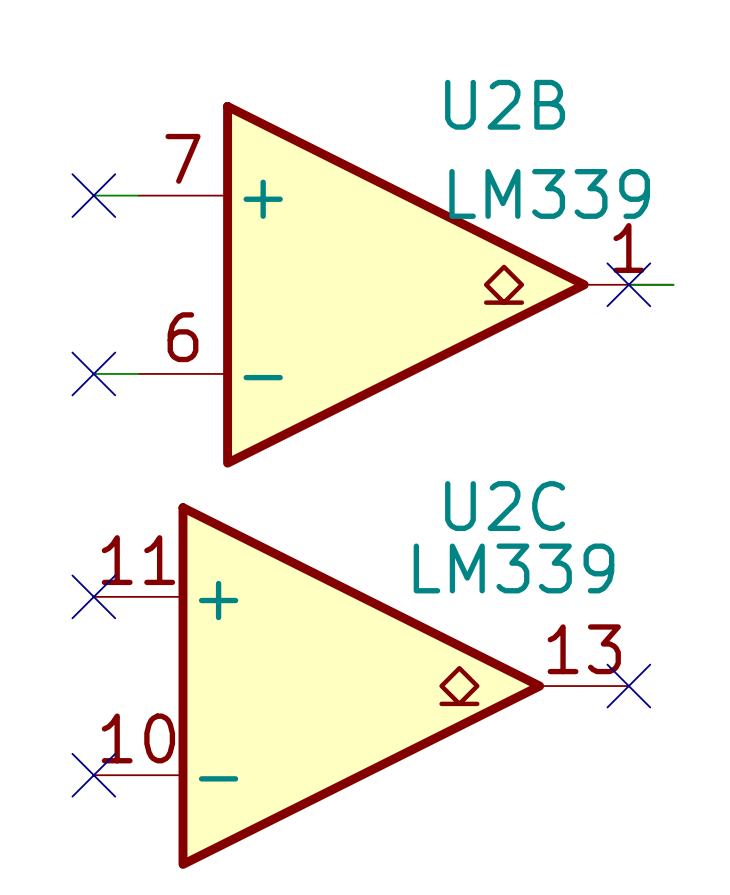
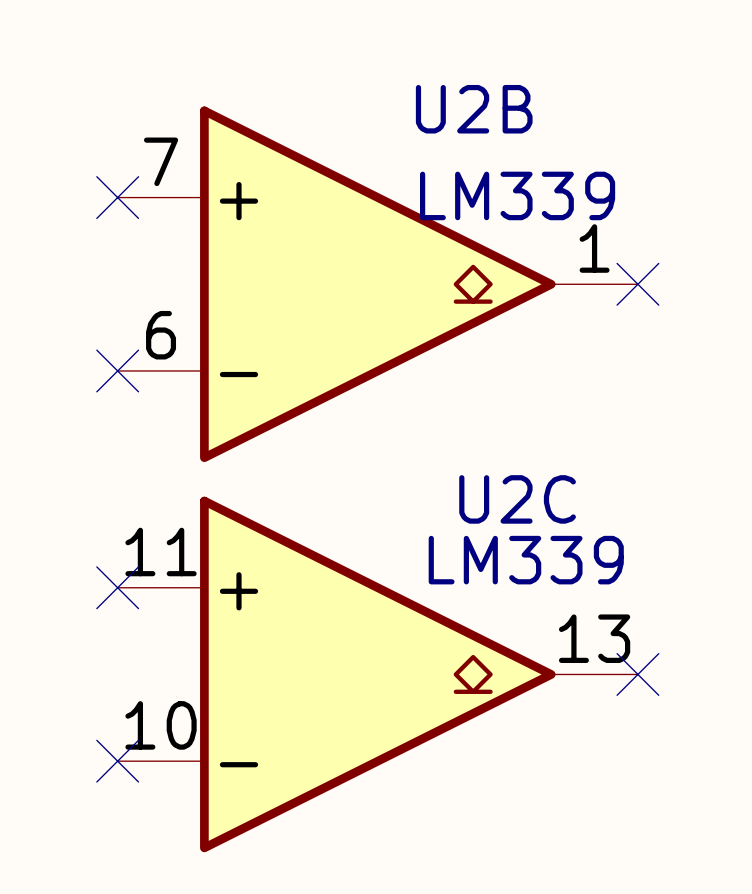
U2B position: (405, 284) -> (377, 284)
wire: (628, 284) (673, 284) -> none

